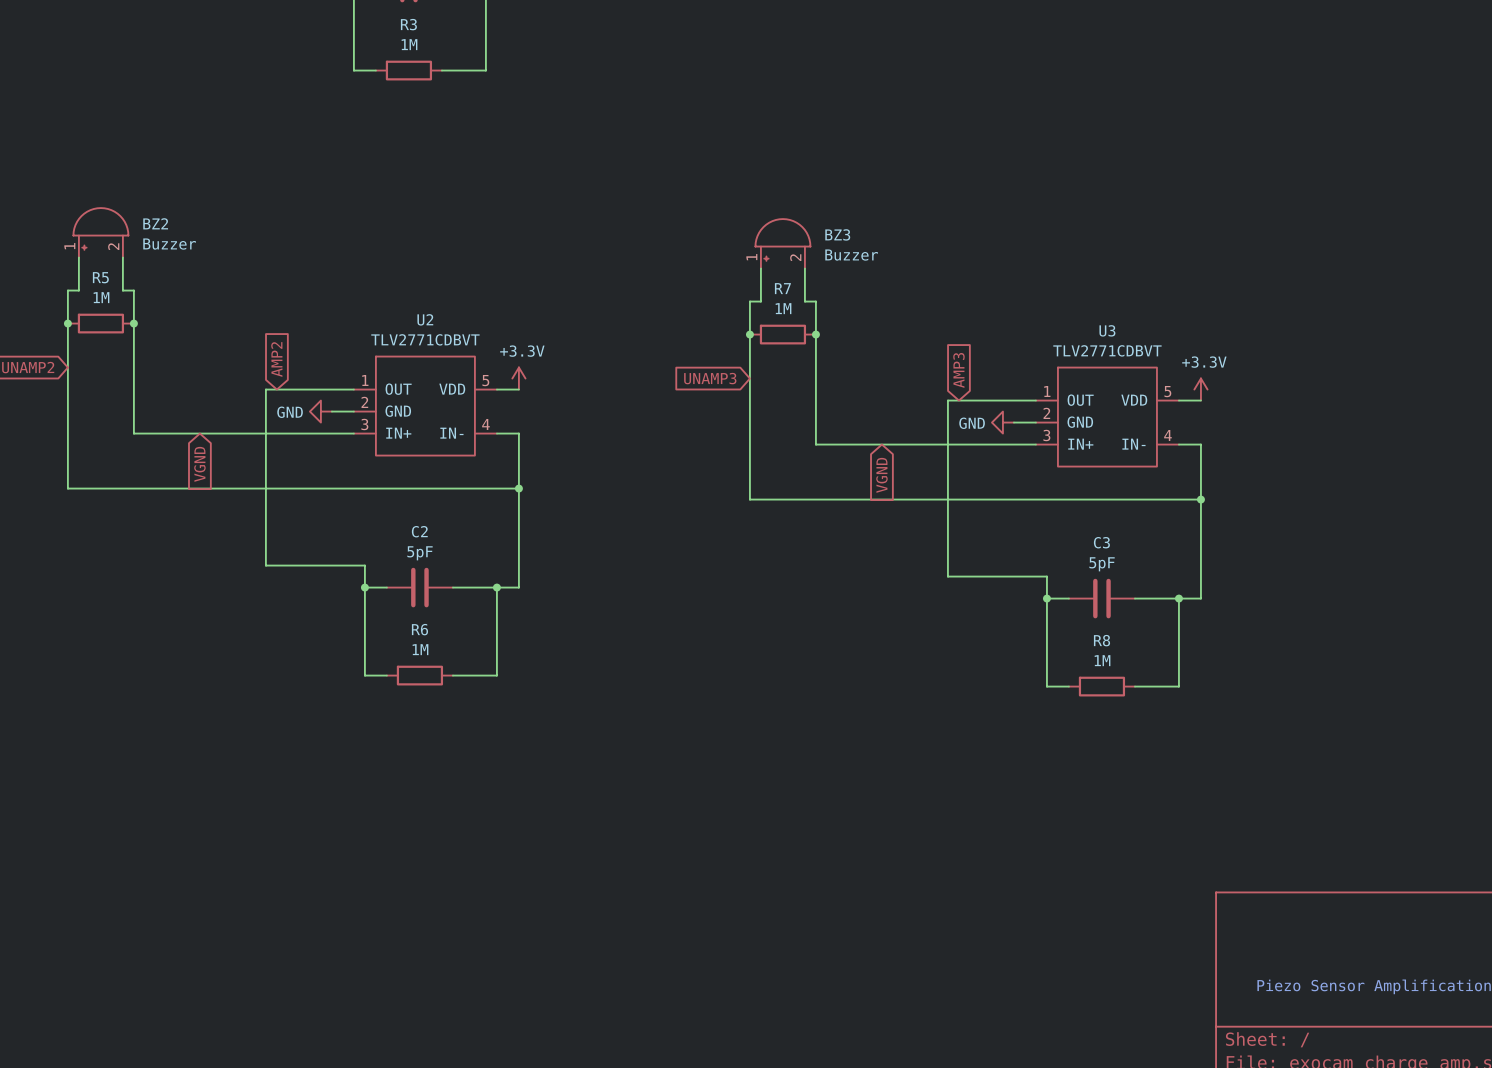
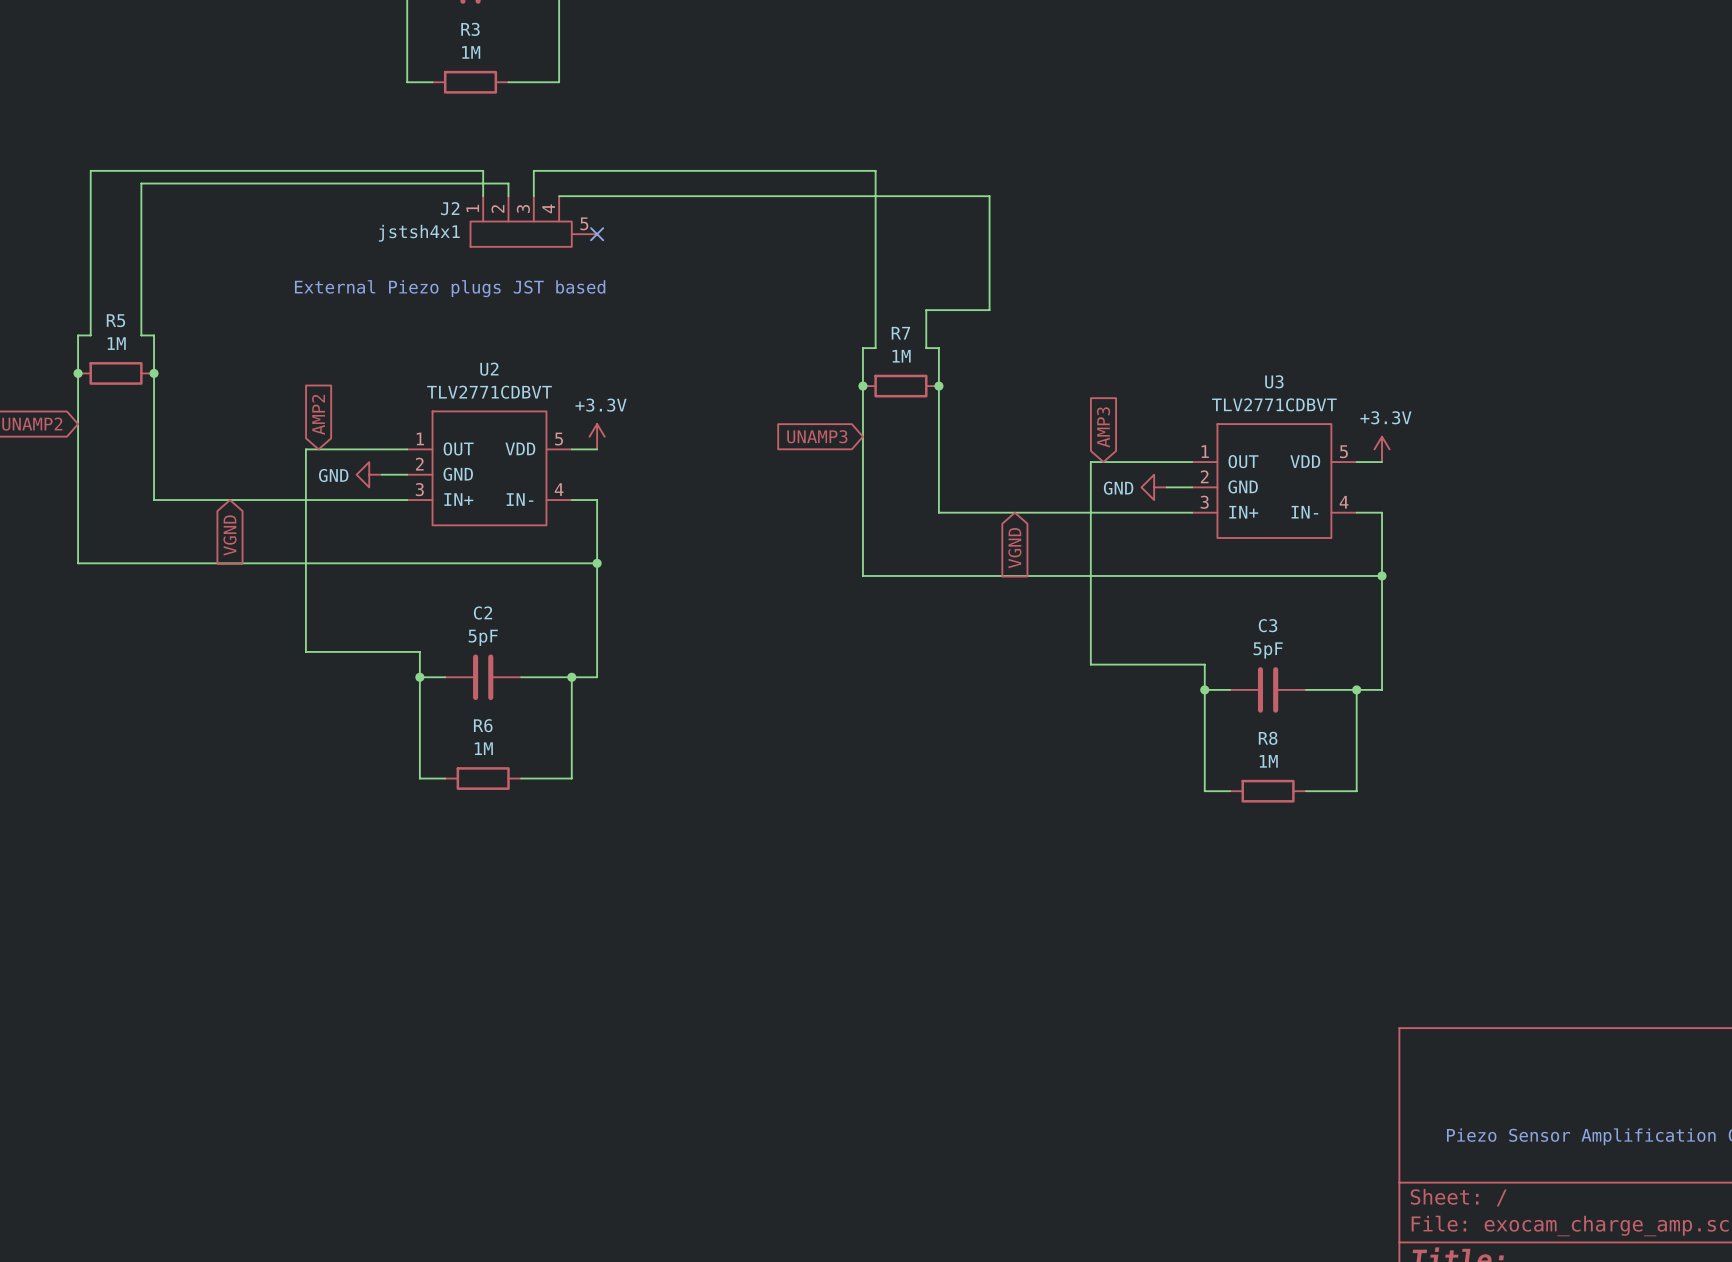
wire: none -> (483, 196) (483, 170) (90, 170) (90, 297)
wire: none -> (508, 196) (508, 183) (141, 183) (141, 297)
wire: none -> (533, 196) (533, 170) (875, 170) (875, 310)
wire: none -> (559, 196) (989, 196) (989, 310) (926, 310)
J2: none -> jstsh4x1 (533, 221)
no-connect mark: none -> (597, 234)
BZ2: Buzzer (100, 232) -> none
BZ3: Buzzer (782, 243) -> none
text: none -> External Piezo plugs JST based (450, 288)

